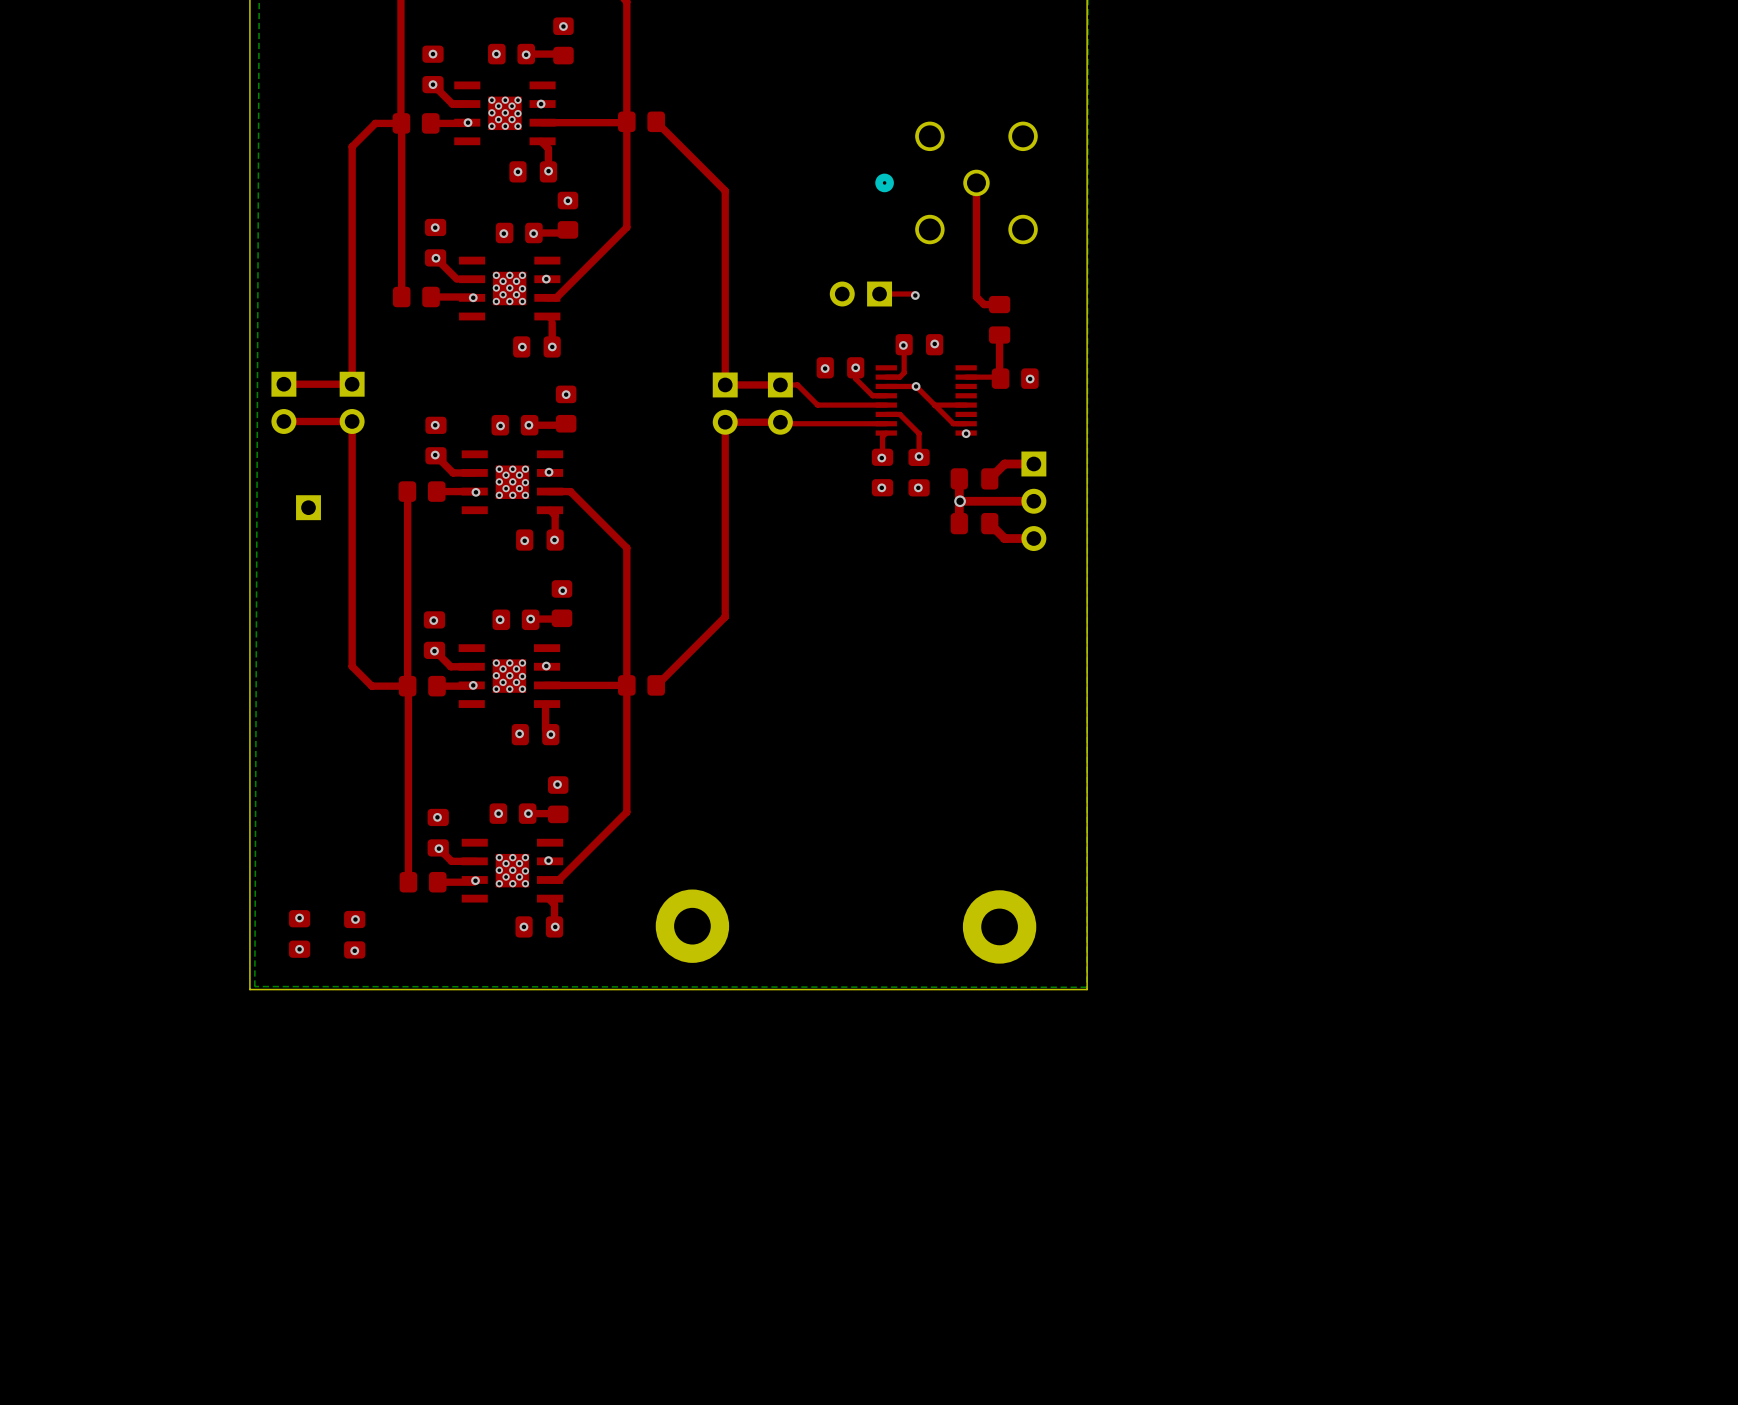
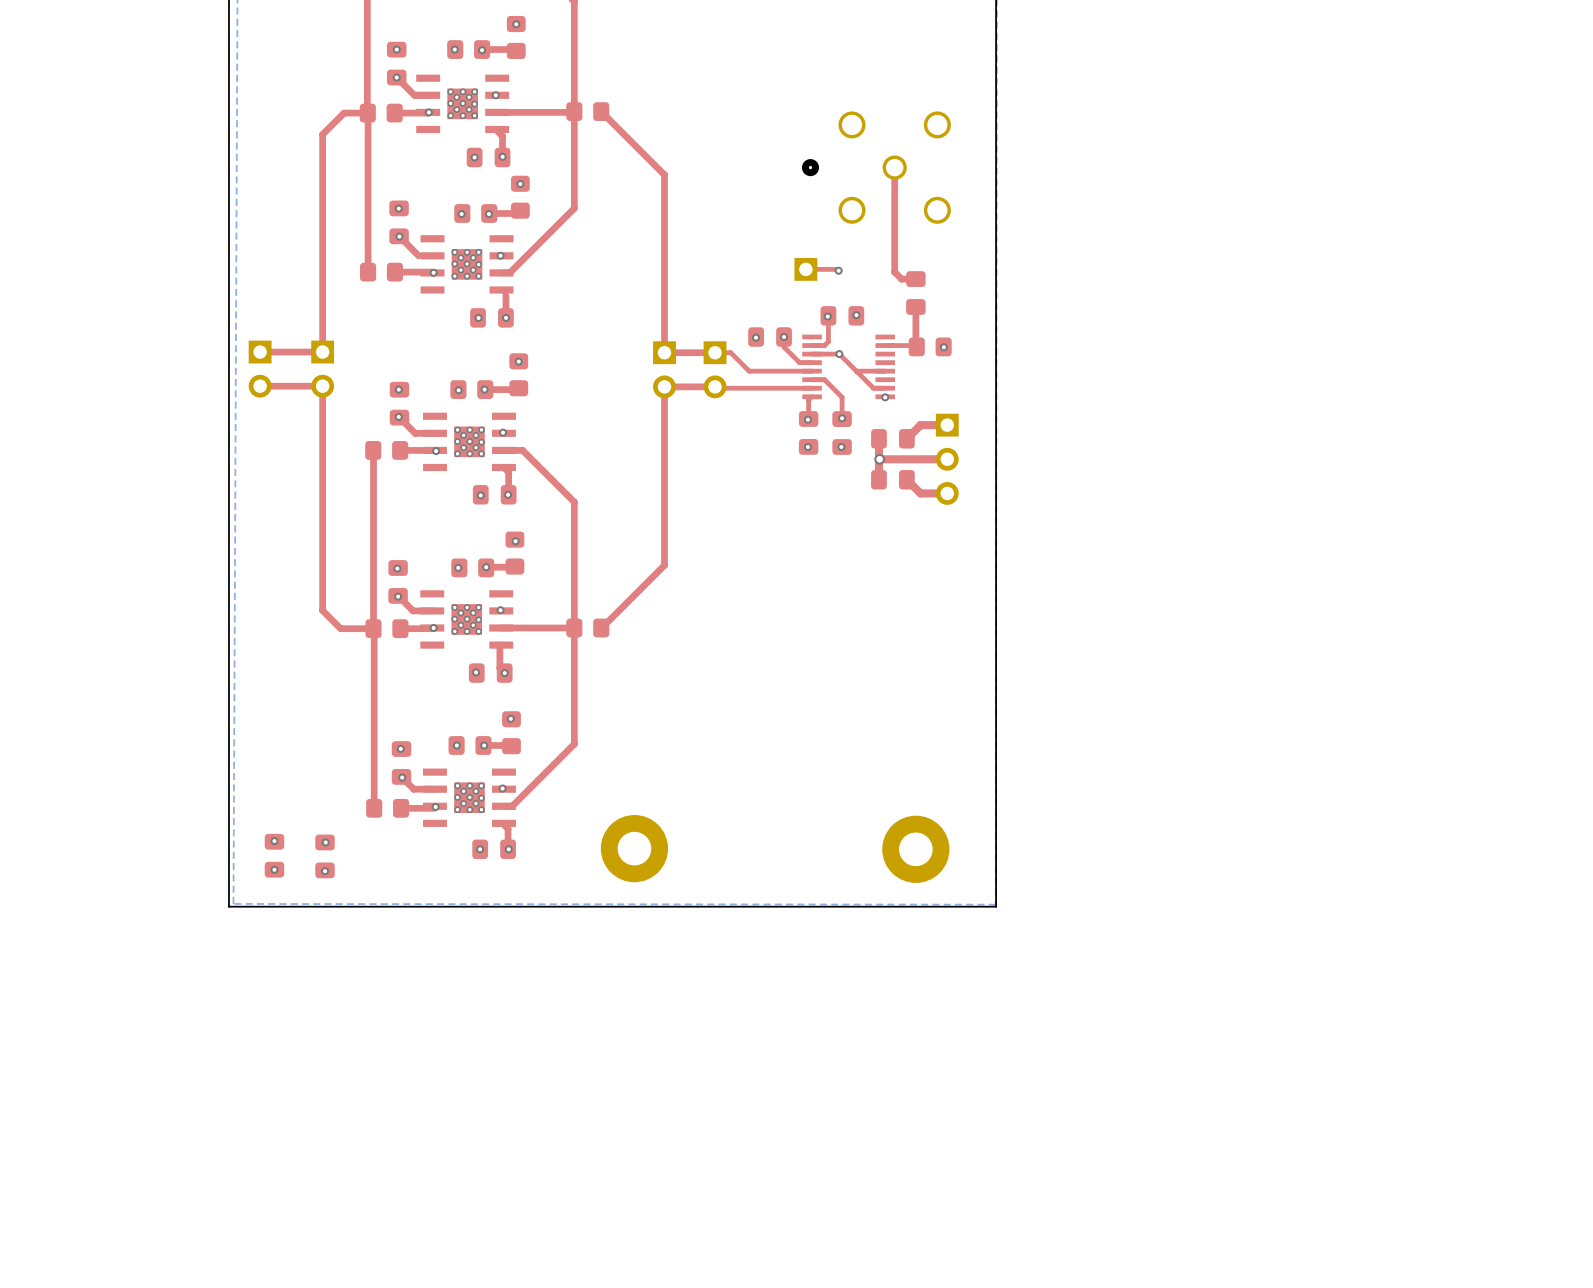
part: (860, 294) -> none
part: (308, 507) -> none

